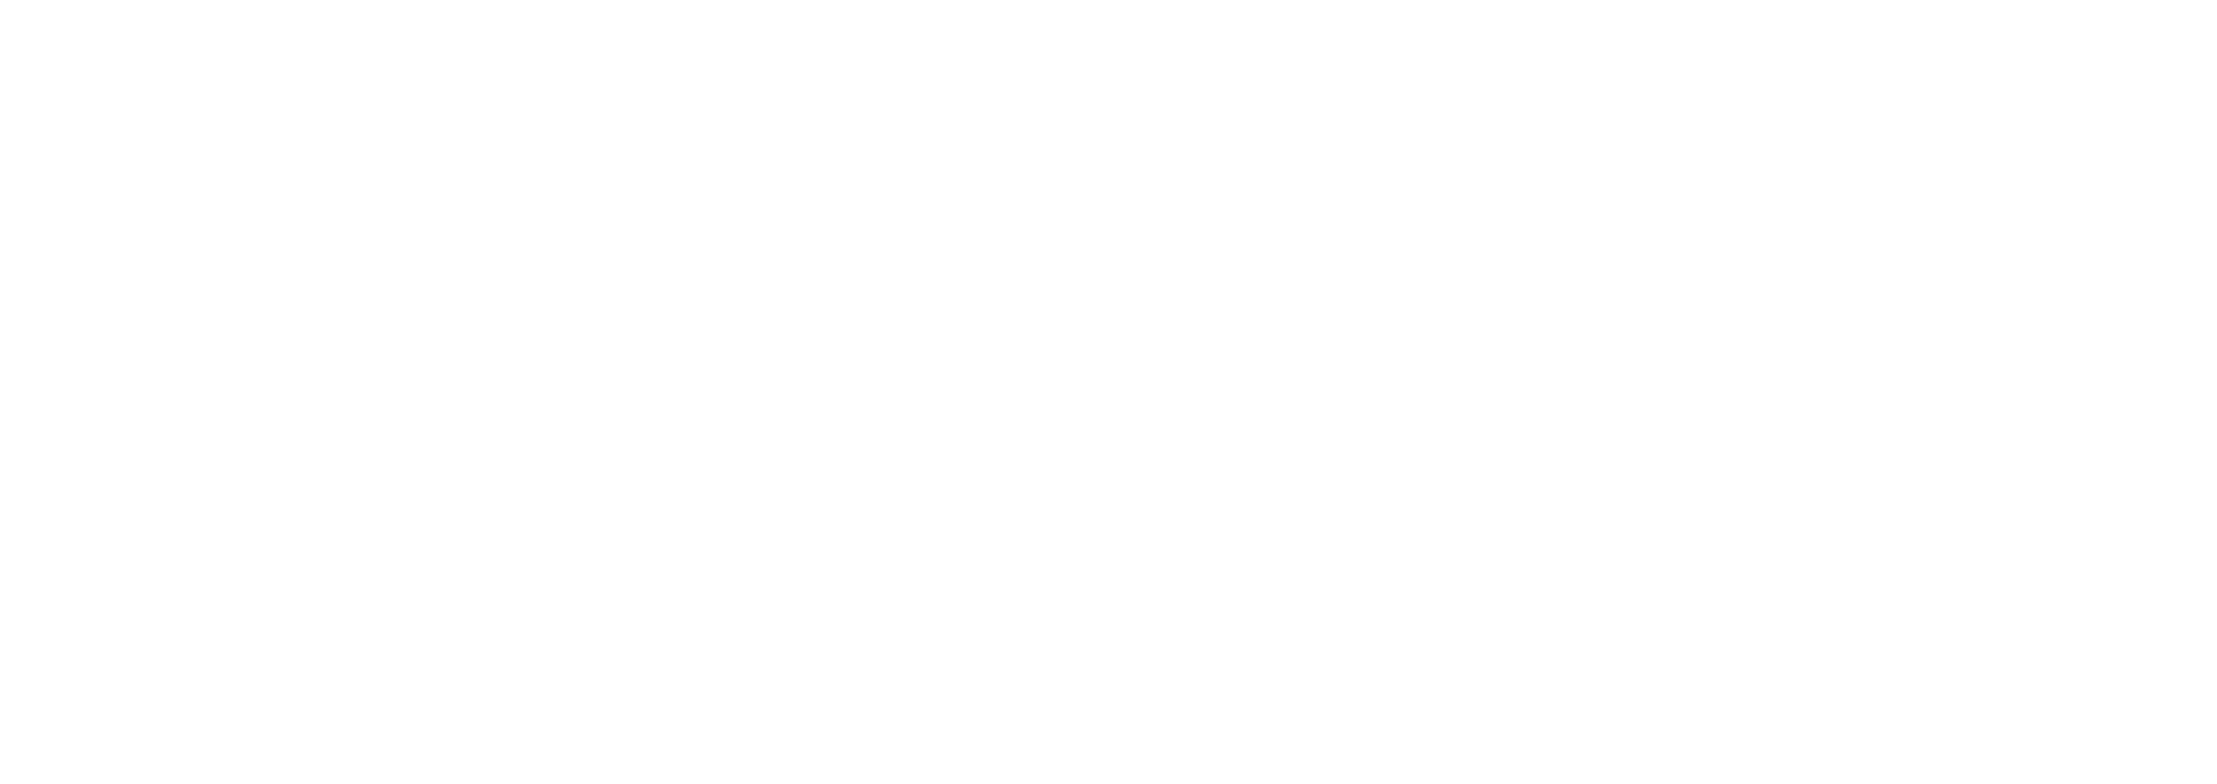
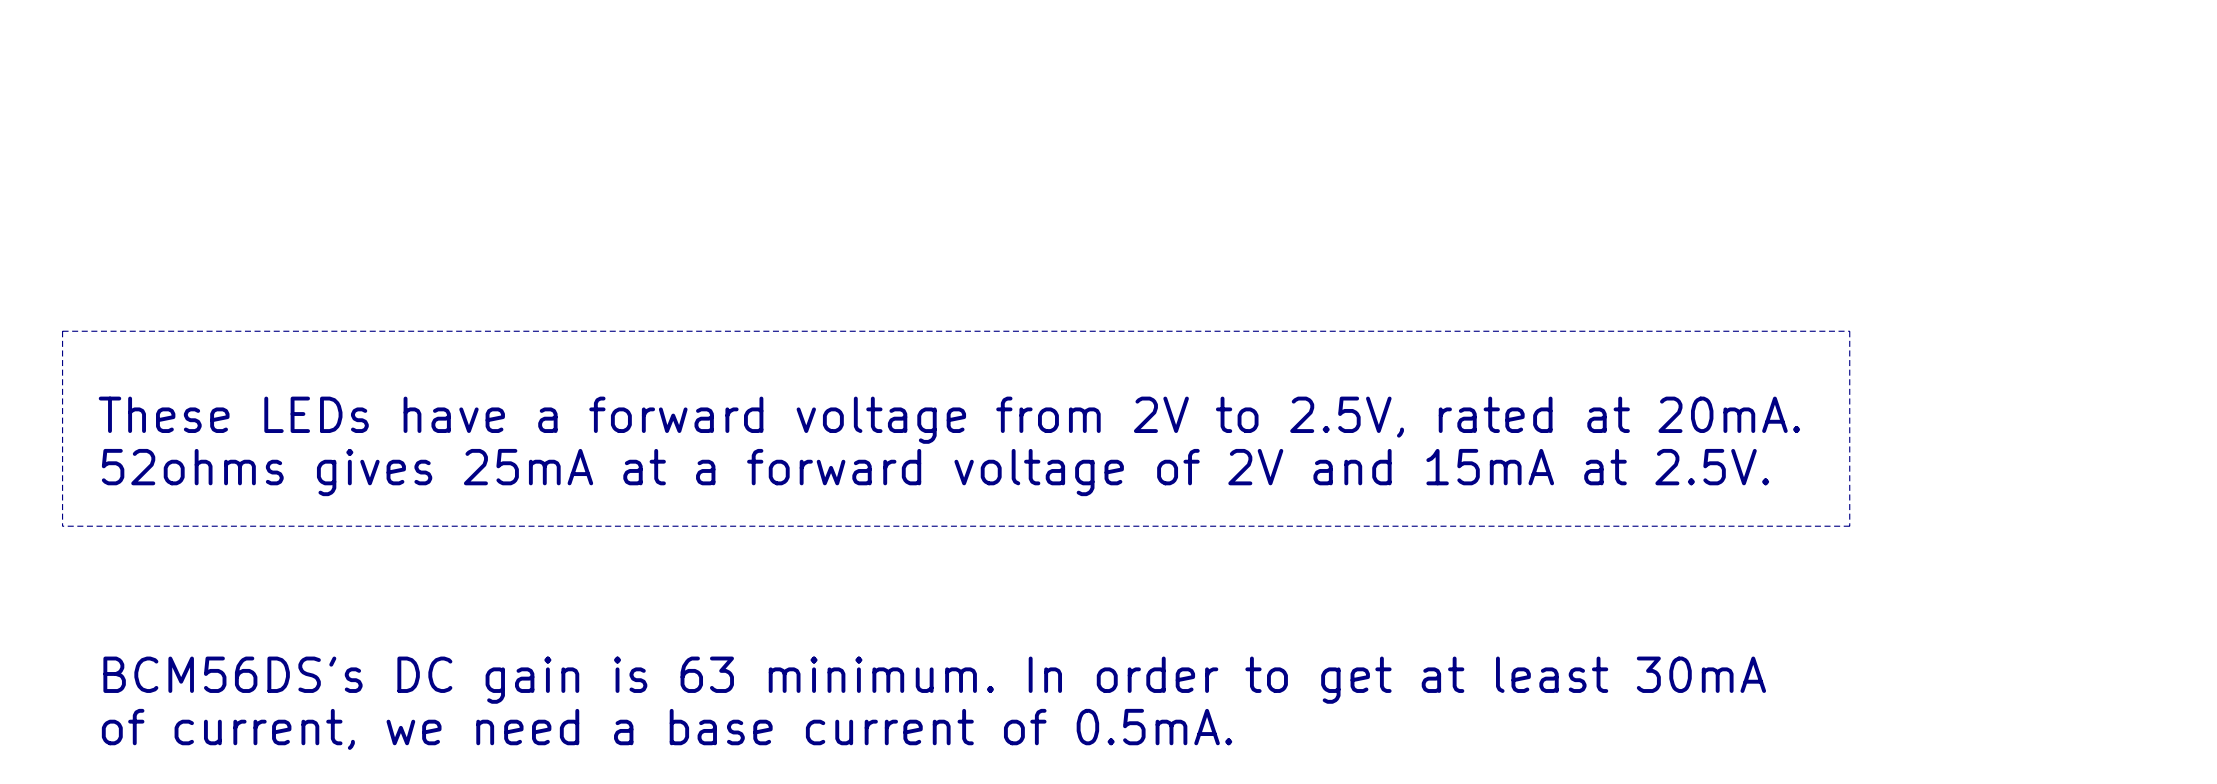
line: none -> (62, 331) (62, 526) (1849, 526) (1849, 331) (62, 331)
text: none -> These LEDs have a forward voltage from 2V to 2.5V, rated at 20mA. (949, 420)
text: none -> 52ohms gives 25mA at a forward voltage of 2V and 15mA at 2.5V. (935, 472)
text: none -> BCM56DS's DC gain is 63 minimum. In order to get at least 30mA (934, 680)
text: none -> of current, we need a base current of 0.5mA. (667, 729)

